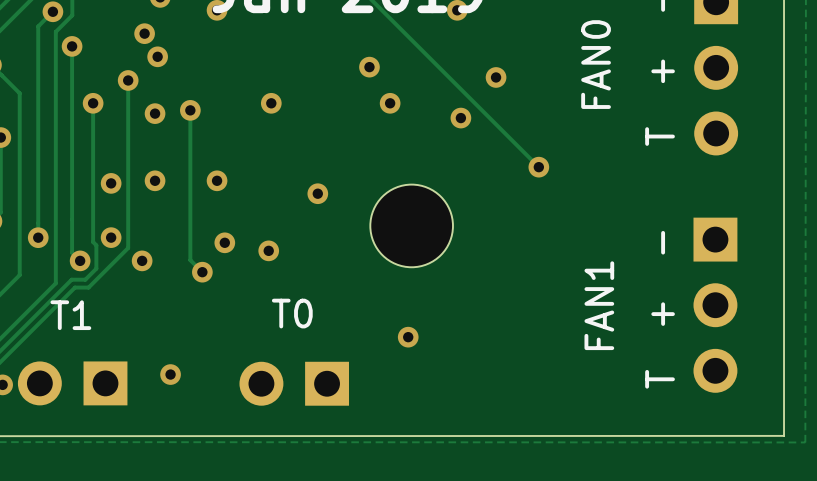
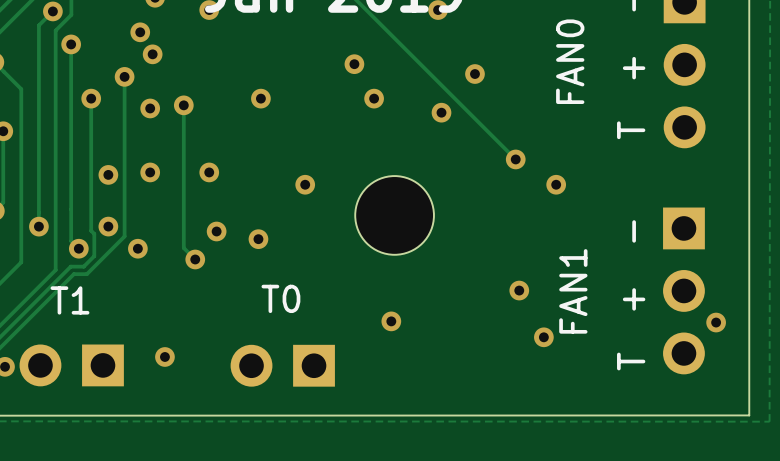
via: none -> (556, 184)
via: none -> (519, 290)
via: none -> (716, 322)
via: none -> (543, 337)

